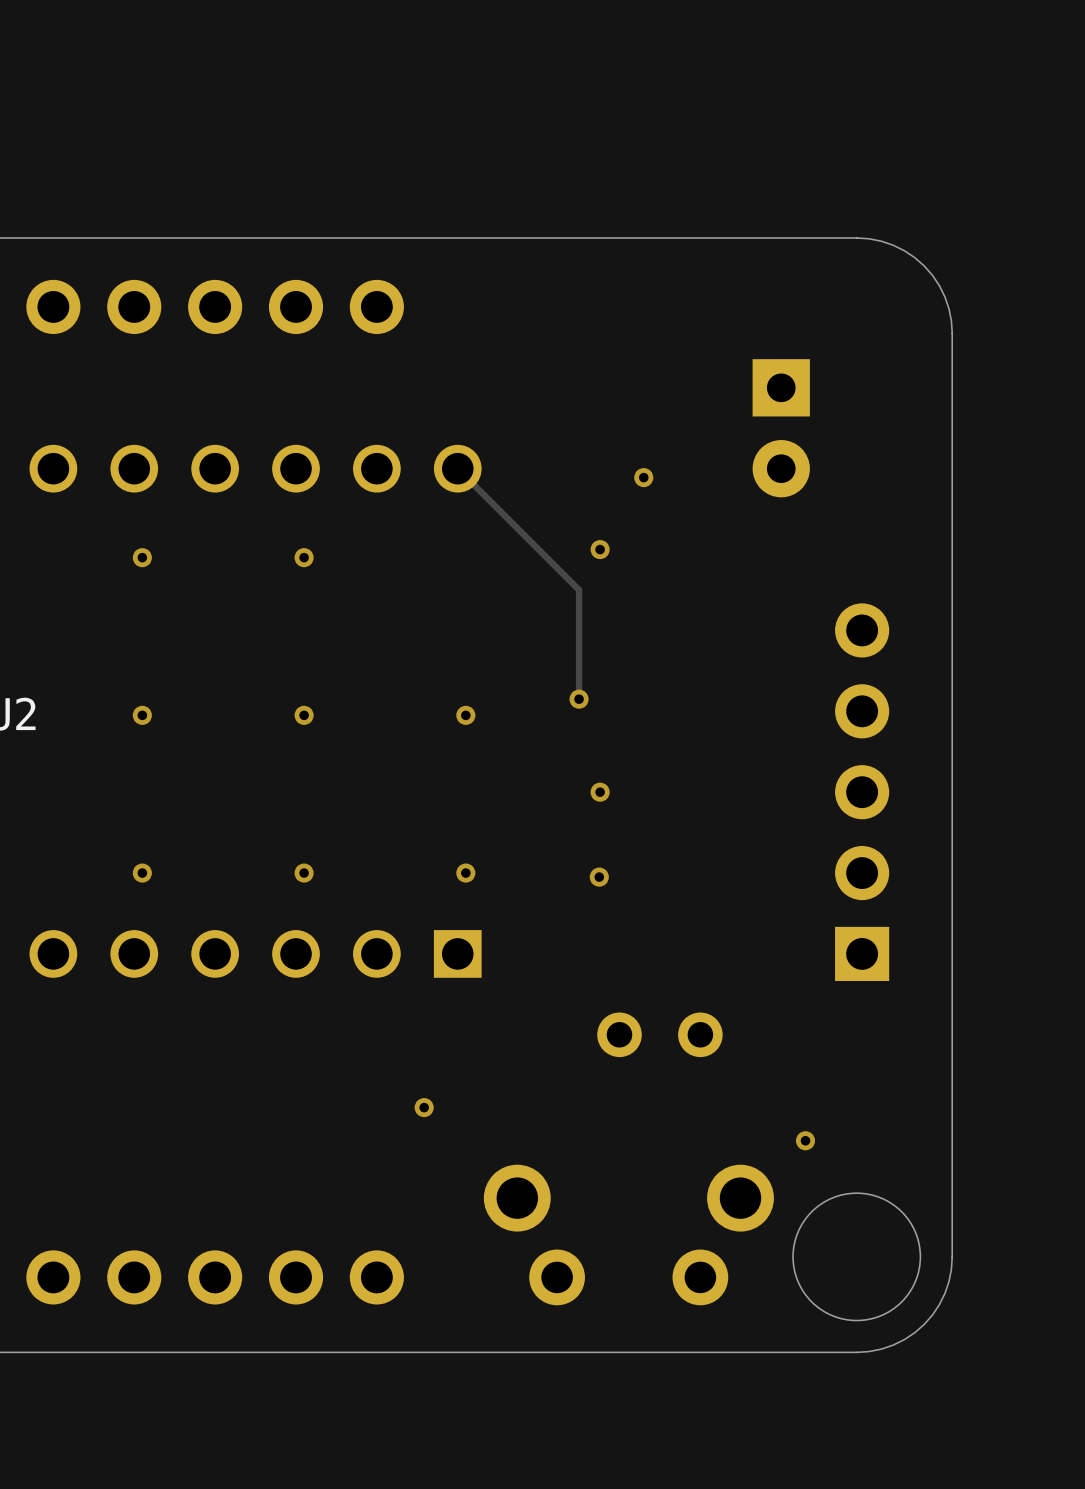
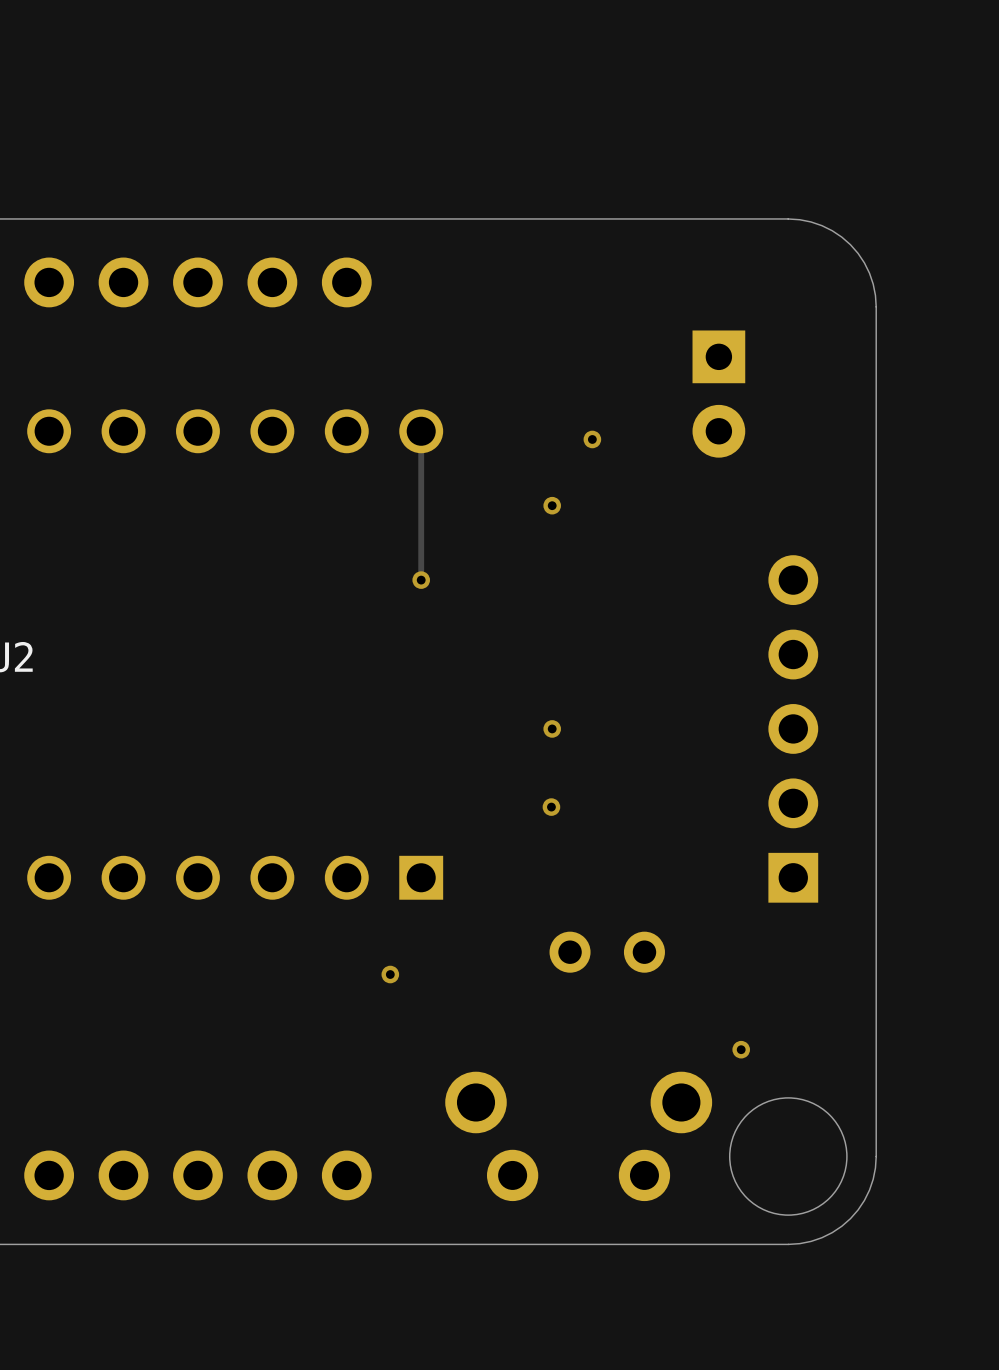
track: (457, 468) (579, 590) (579, 699) -> (421, 431) (421, 580)
via: (142, 557) -> none
via: (304, 557) -> none
via: none -> (421, 580)
via: (579, 699) -> none
via: (142, 715) -> none
via: (304, 715) -> none
via: (465, 715) -> none
via: (142, 873) -> none
via: (304, 873) -> none
via: (465, 873) -> none
via position: (424, 1107) -> (390, 974)

